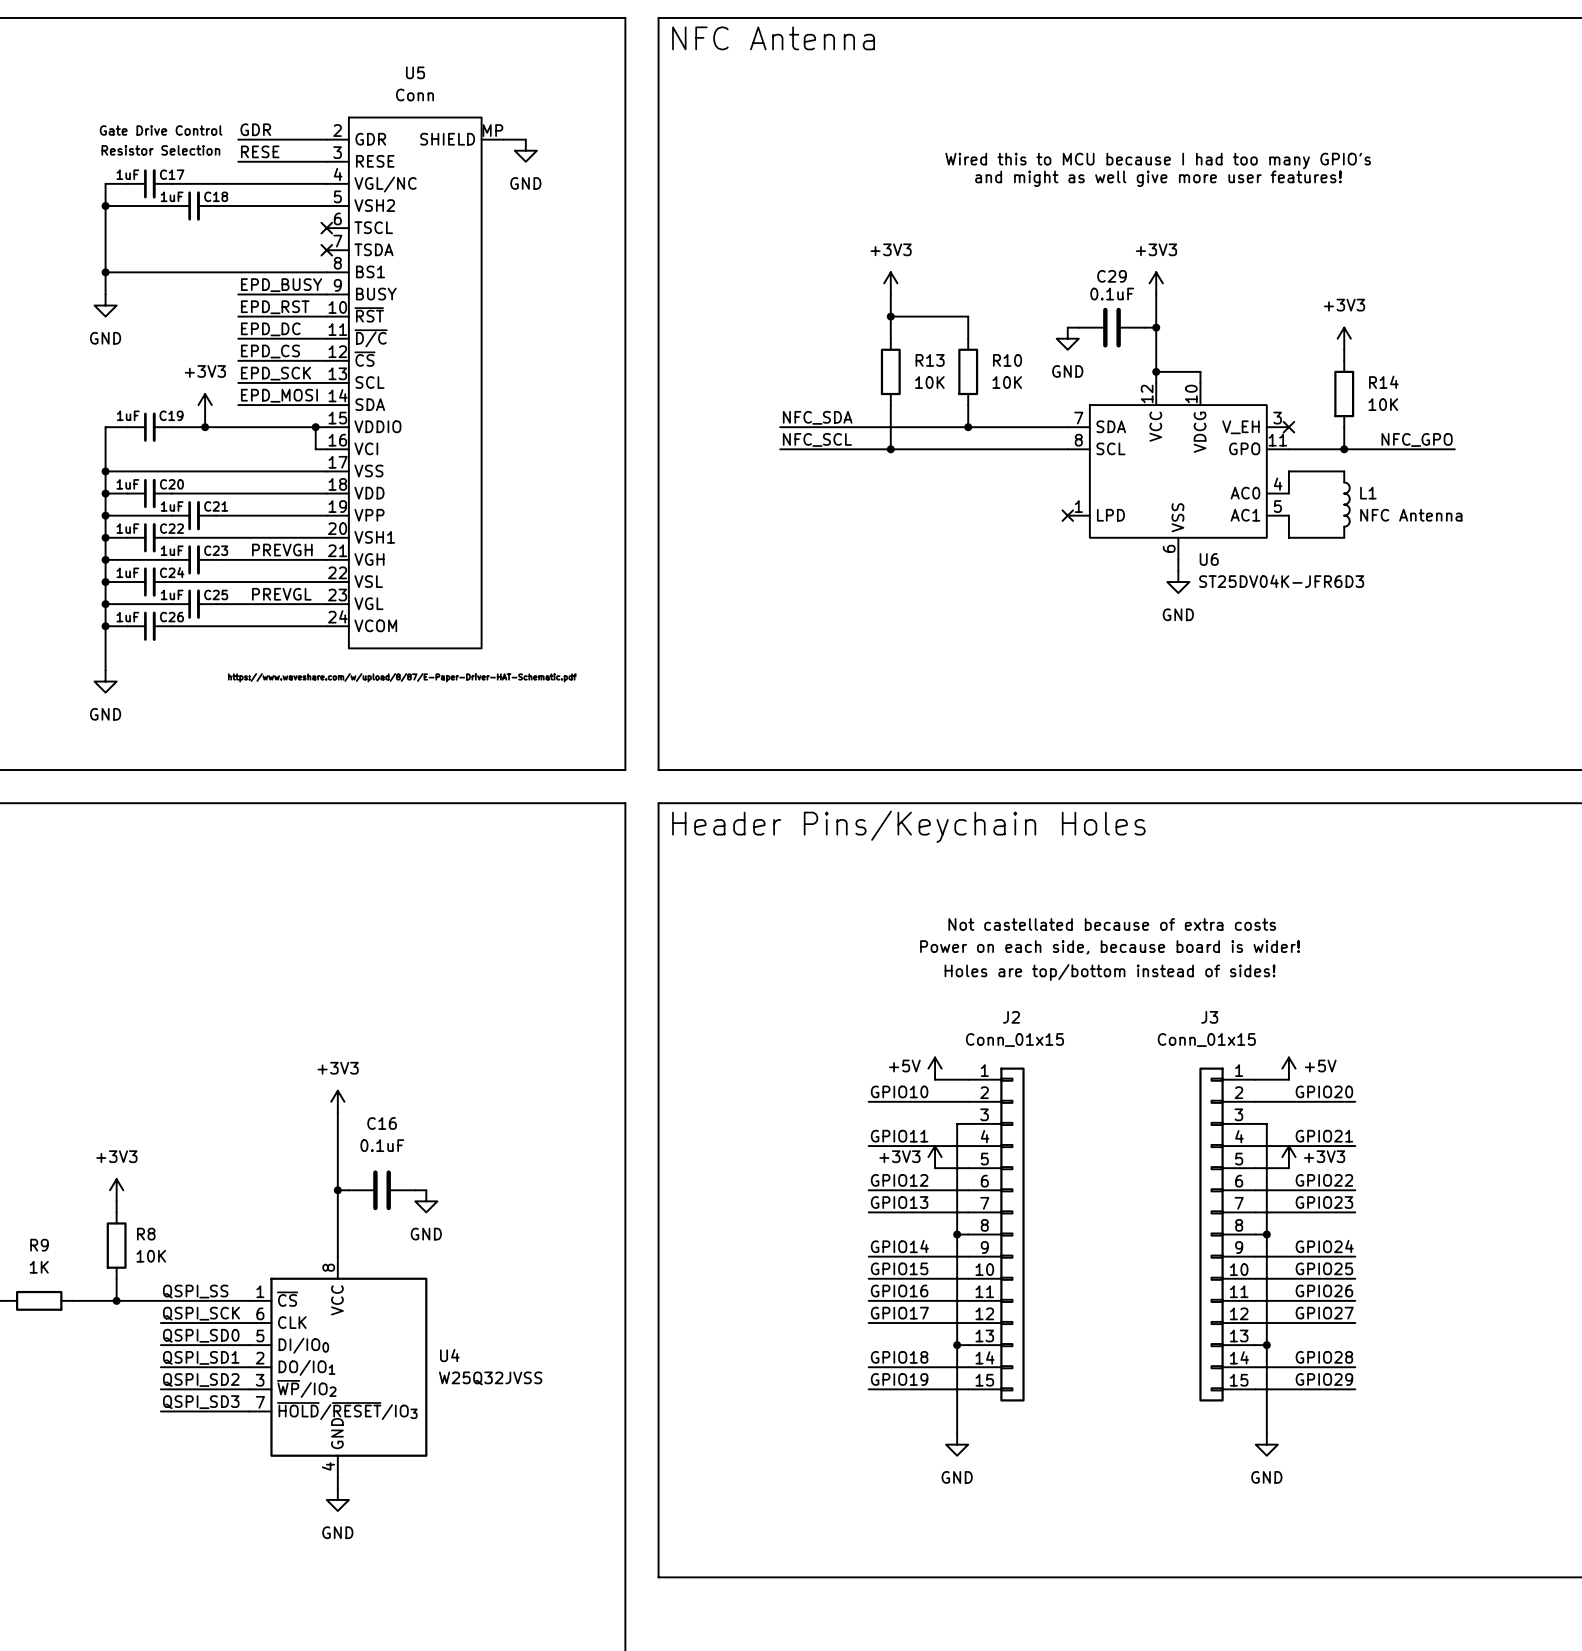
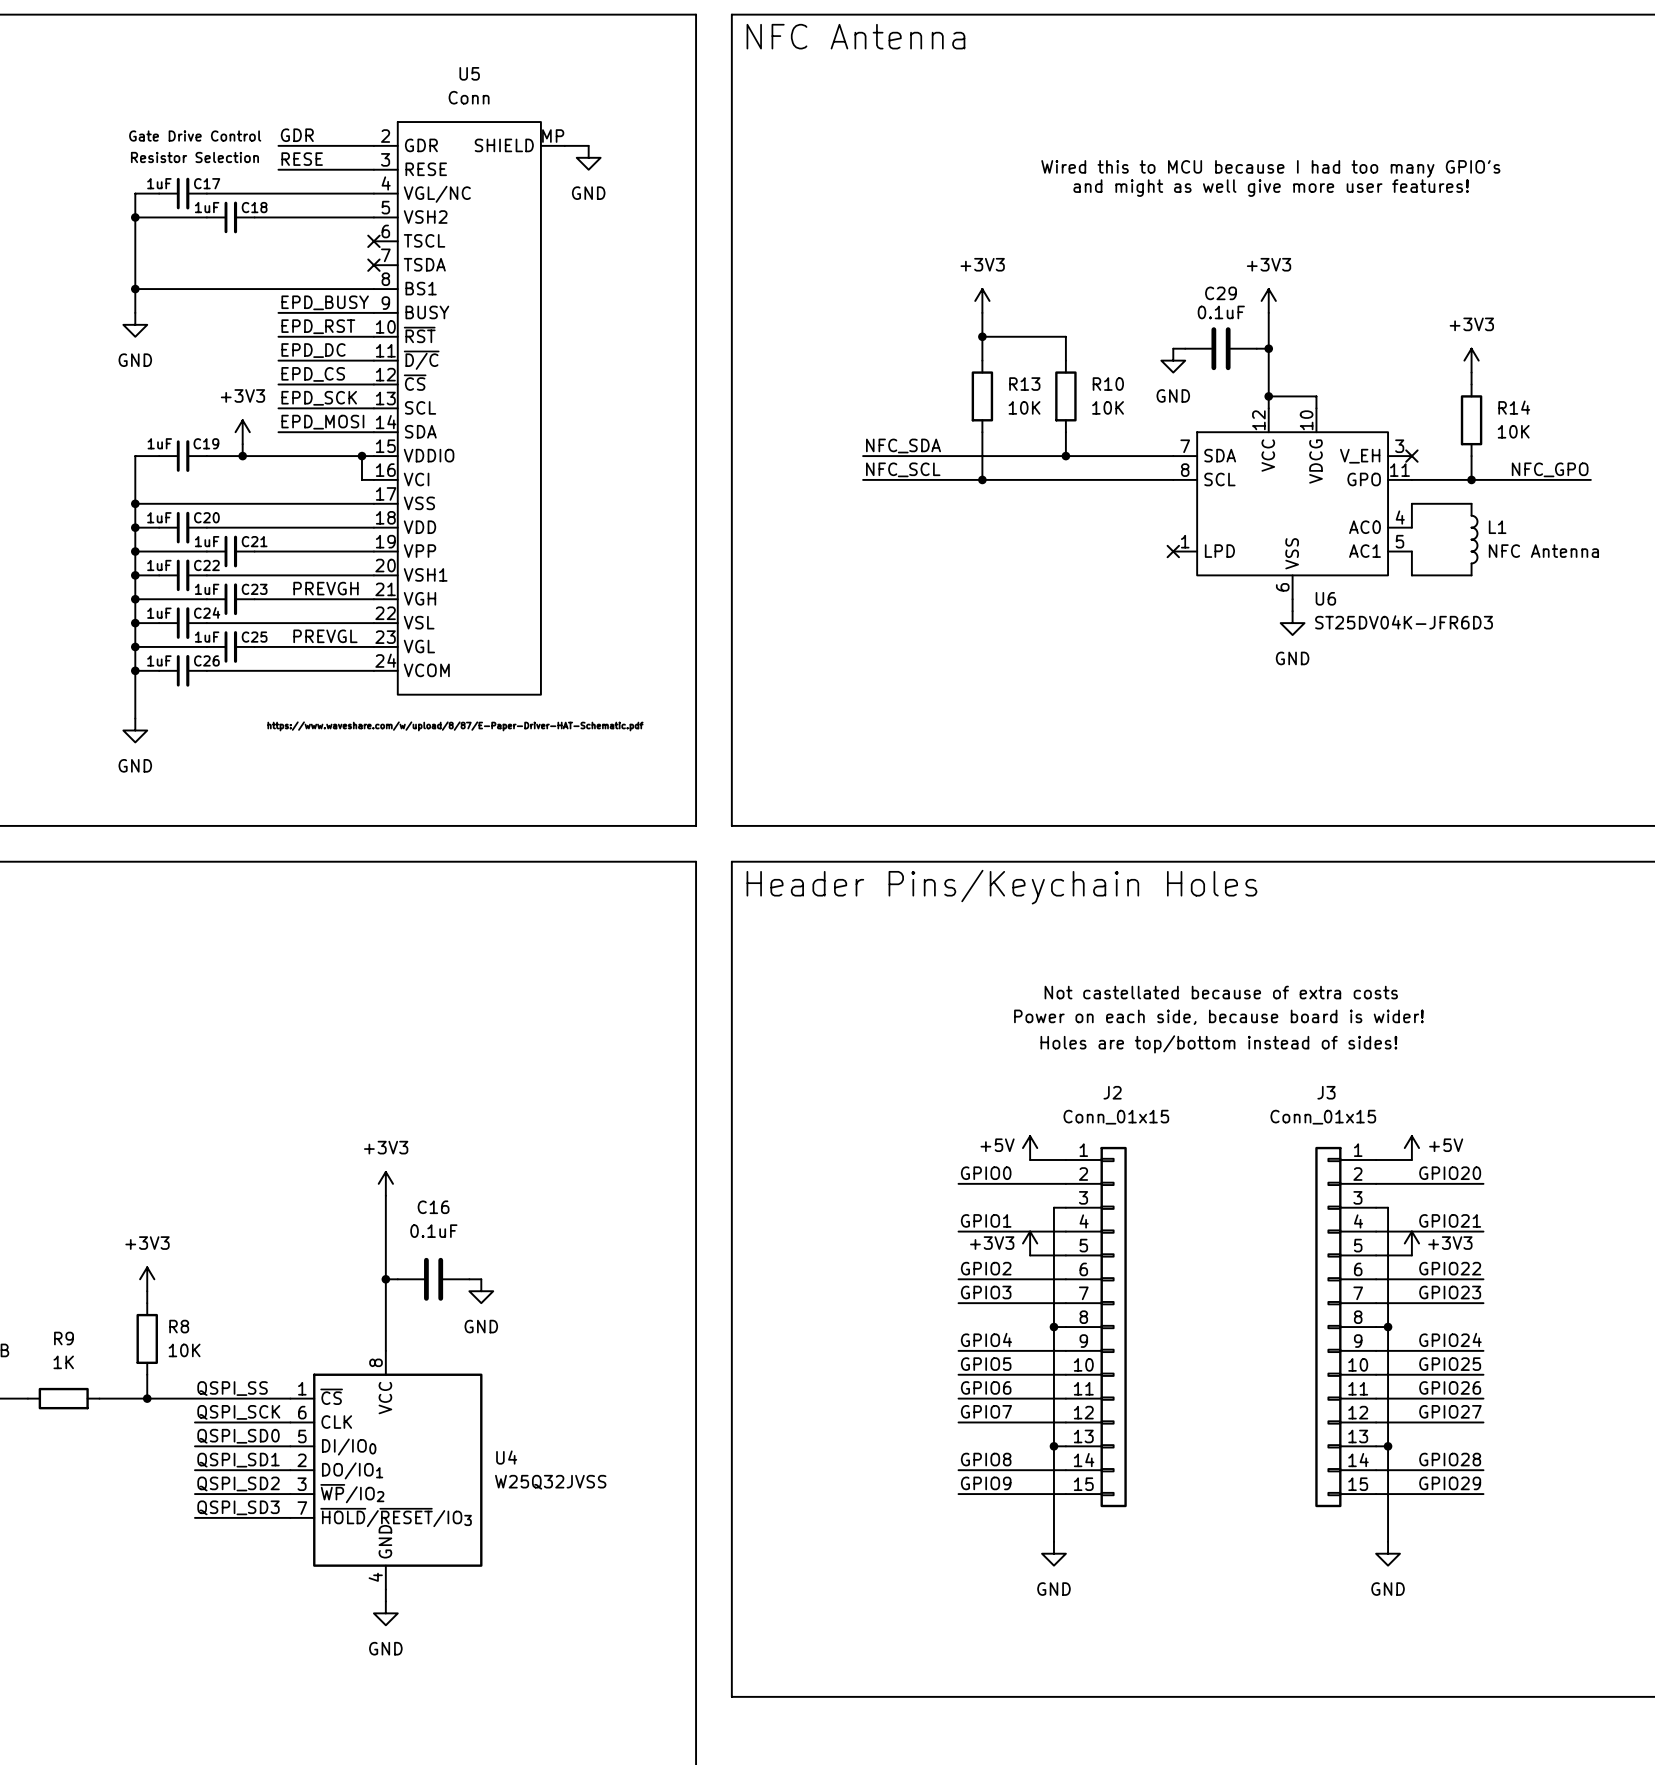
label: GPIO10 (899, 1091) -> GPIO0 (986, 1173)
label: GPIO11 (899, 1136) -> GPIO1 (986, 1220)
label: GPIO12 (899, 1180) -> GPIO2 (986, 1268)
label: GPIO13 (899, 1202) -> GPIO3 (986, 1292)
label: GPIO14 (899, 1246) -> GPIO4 (986, 1339)
label: GPIO15 (899, 1268) -> GPIO5 (986, 1364)
label: GPIO16 (899, 1291) -> GPIO6 (986, 1387)
label: GPIO17 (899, 1313) -> GPIO7 (986, 1411)
label: GPIO18 (899, 1357) -> GPIO8 (986, 1459)
label: GPIO19 (899, 1379) -> GPIO9 (986, 1483)

